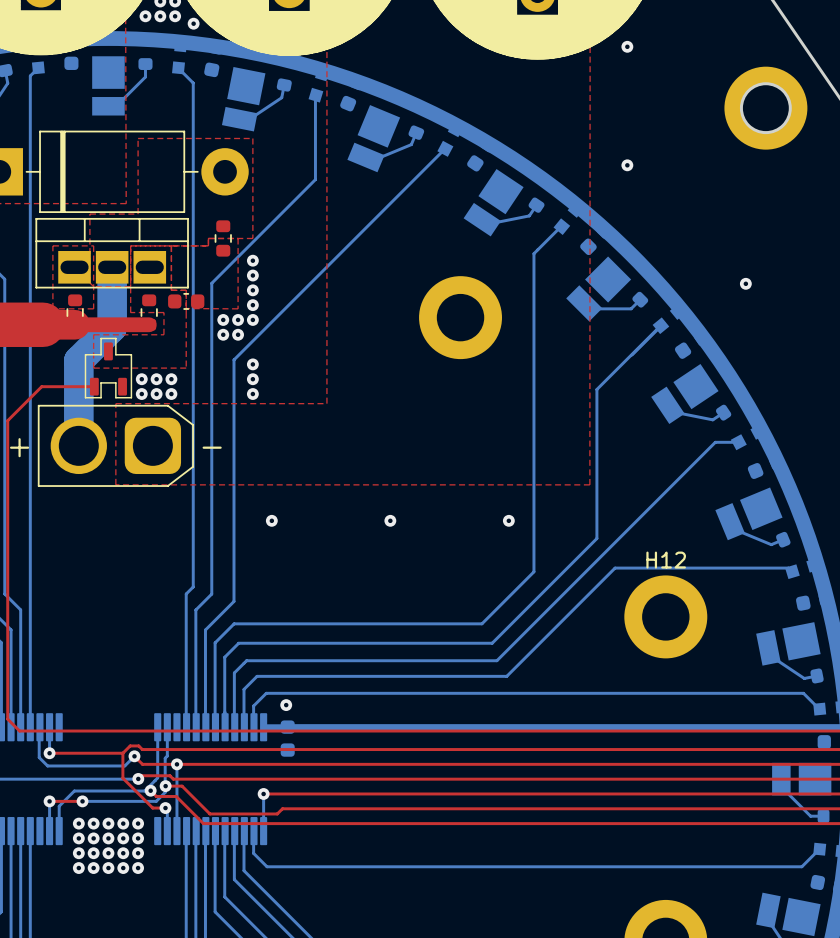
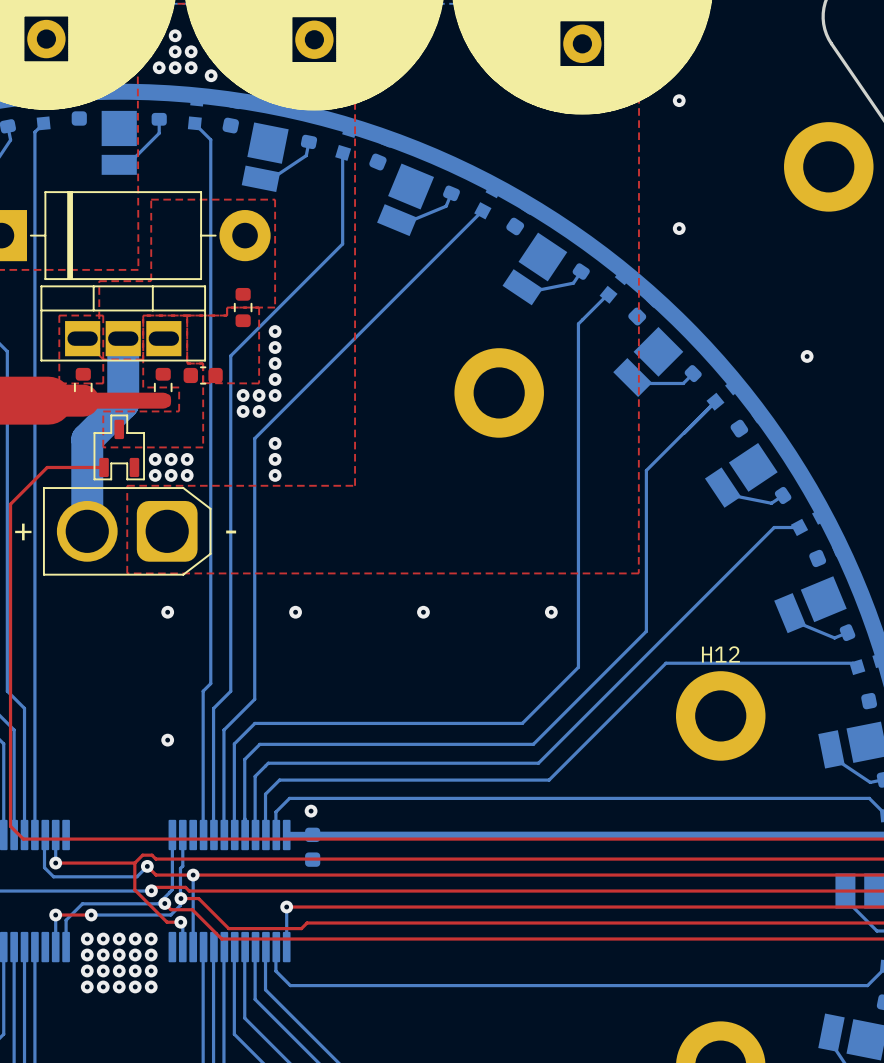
round board edge: [739, 82, 792, 135] -> none
via: none -> (167, 612)
via: none -> (167, 740)

